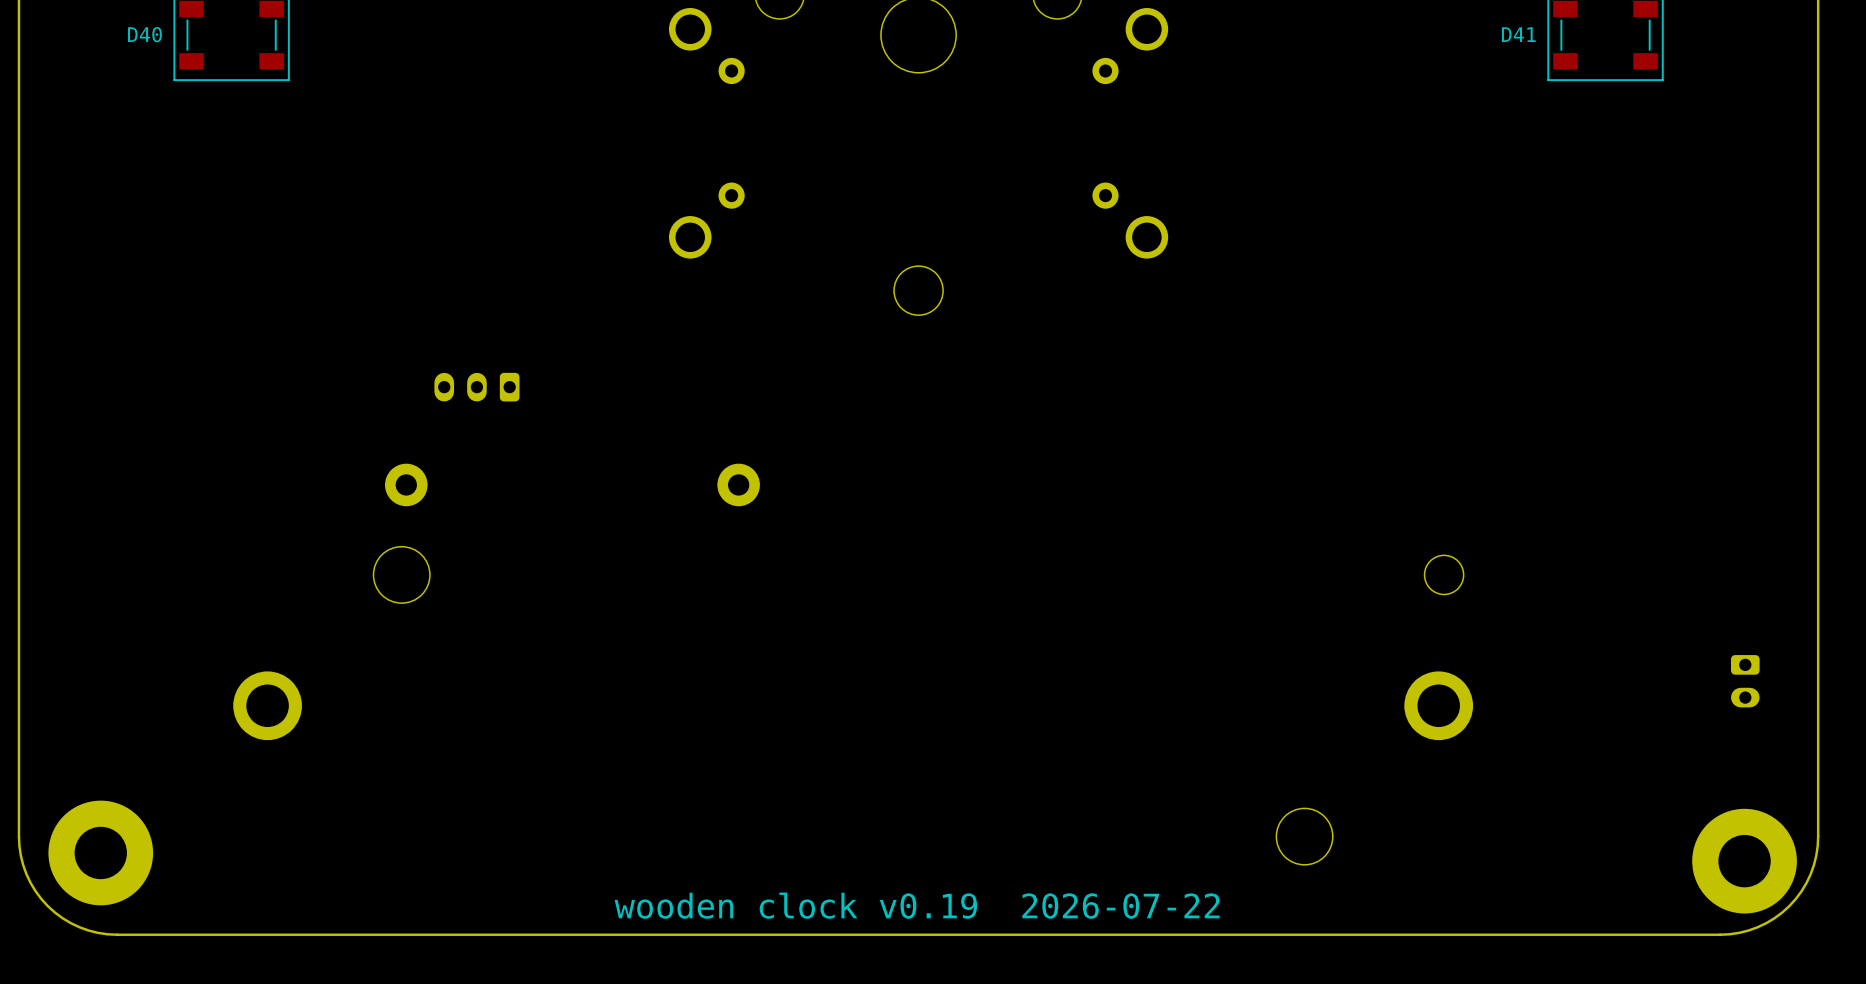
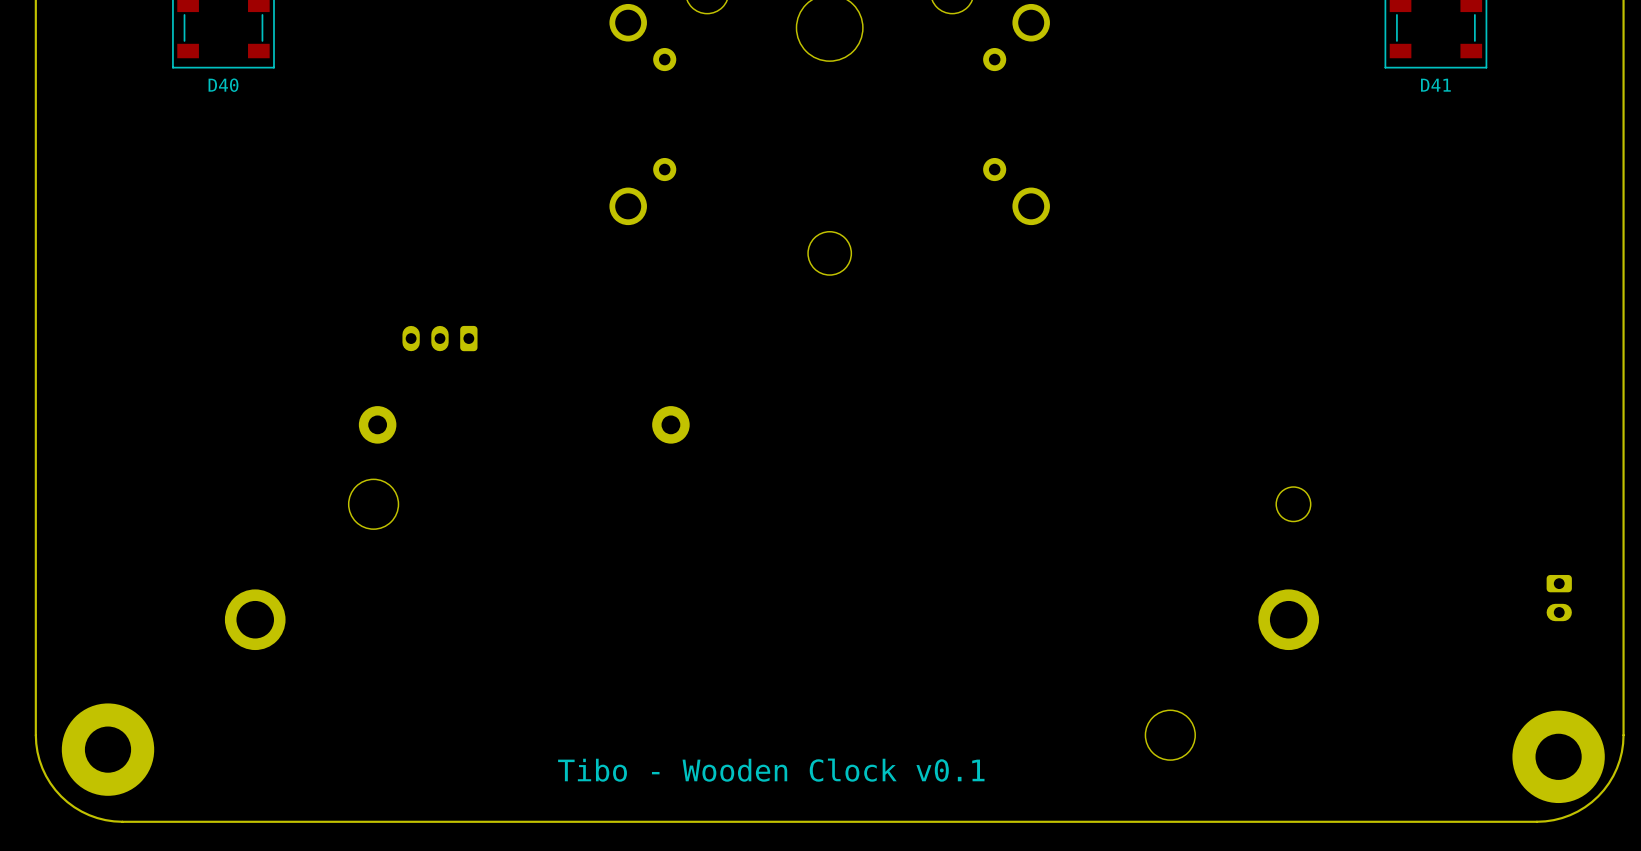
D40 name position: D40 (144, 34) -> D40 (223, 85)
D41 name position: D41 (1518, 34) -> D41 (1435, 85)
text: none -> Tibo - Wooden Clock v0.1 (771, 770)
text: wooden clock v0.19 2026-07-22 (917, 905) -> none

